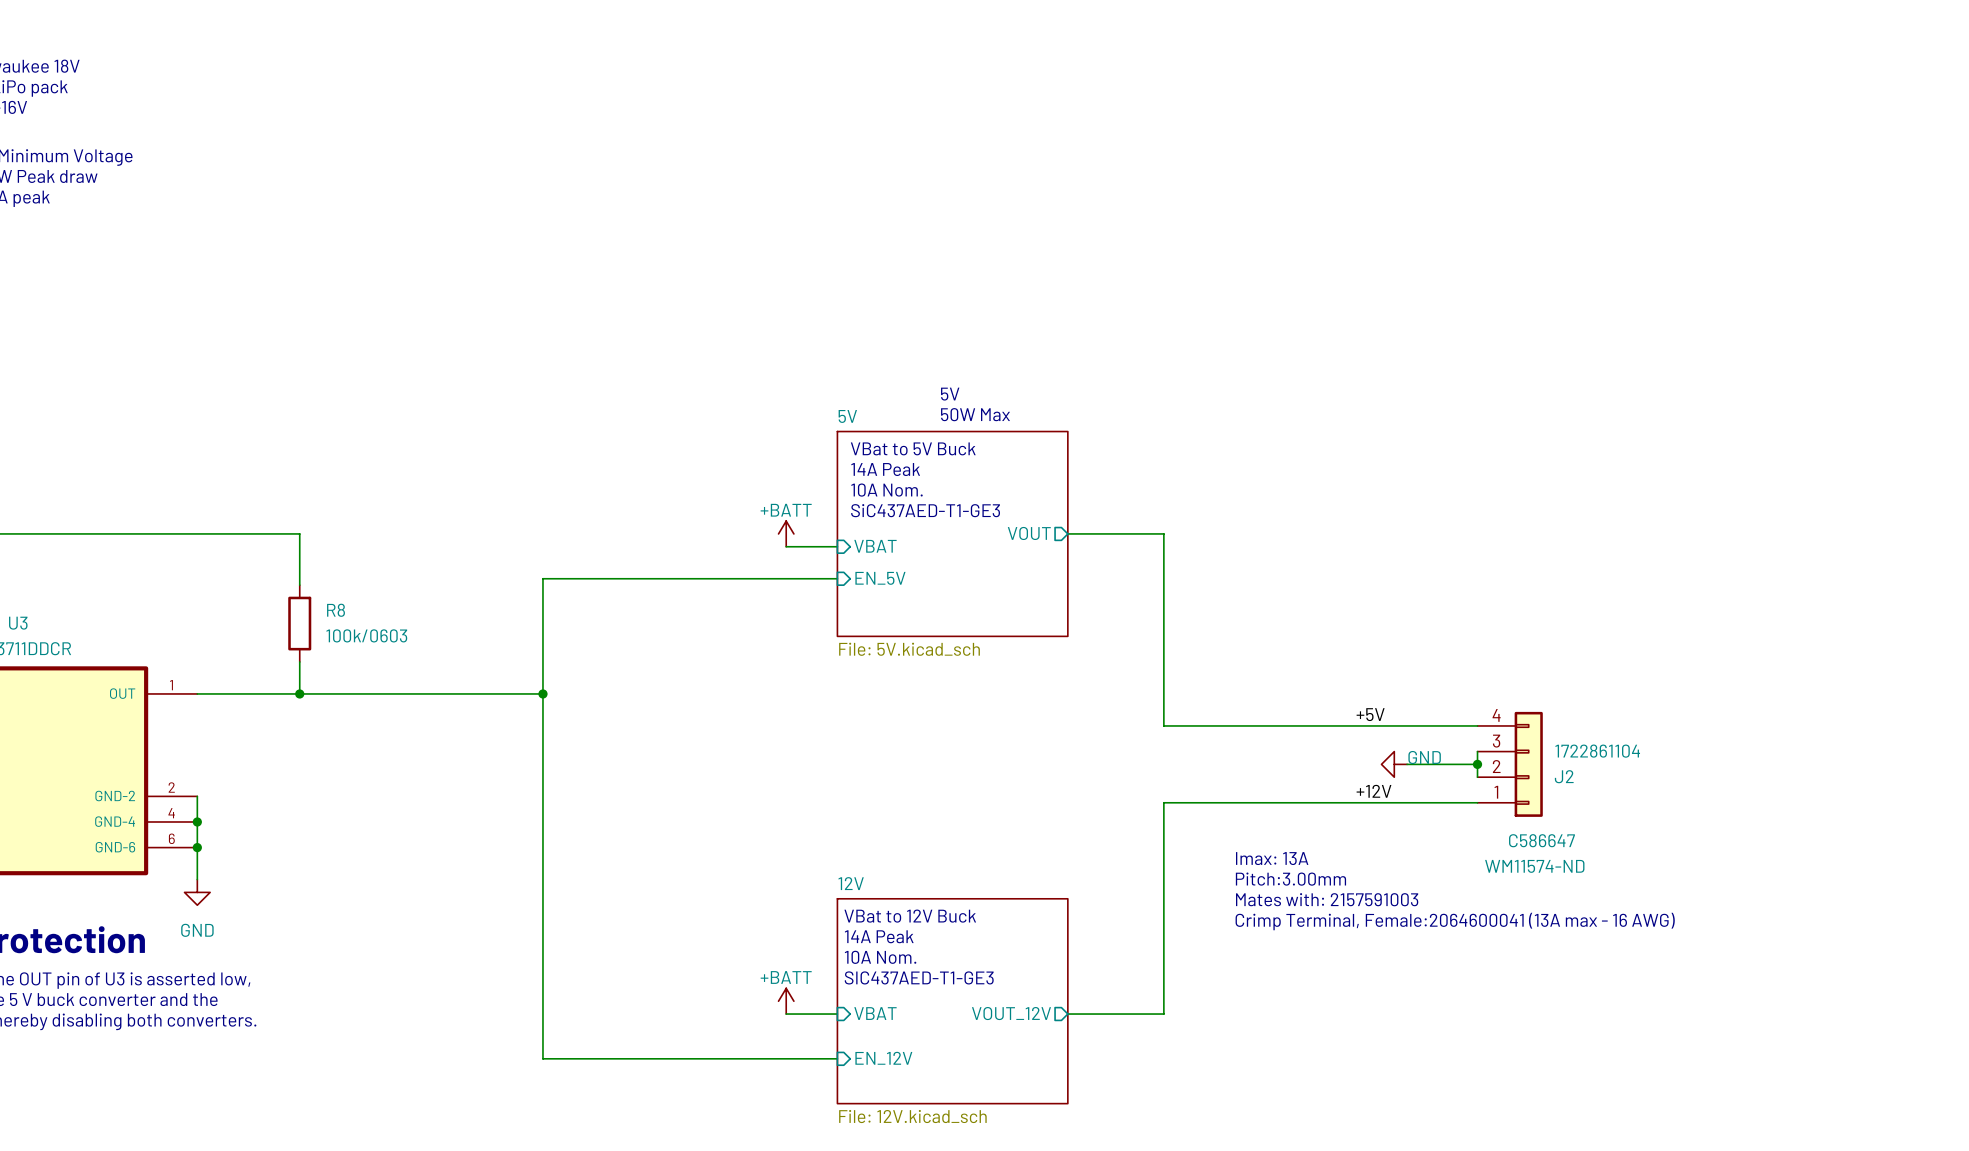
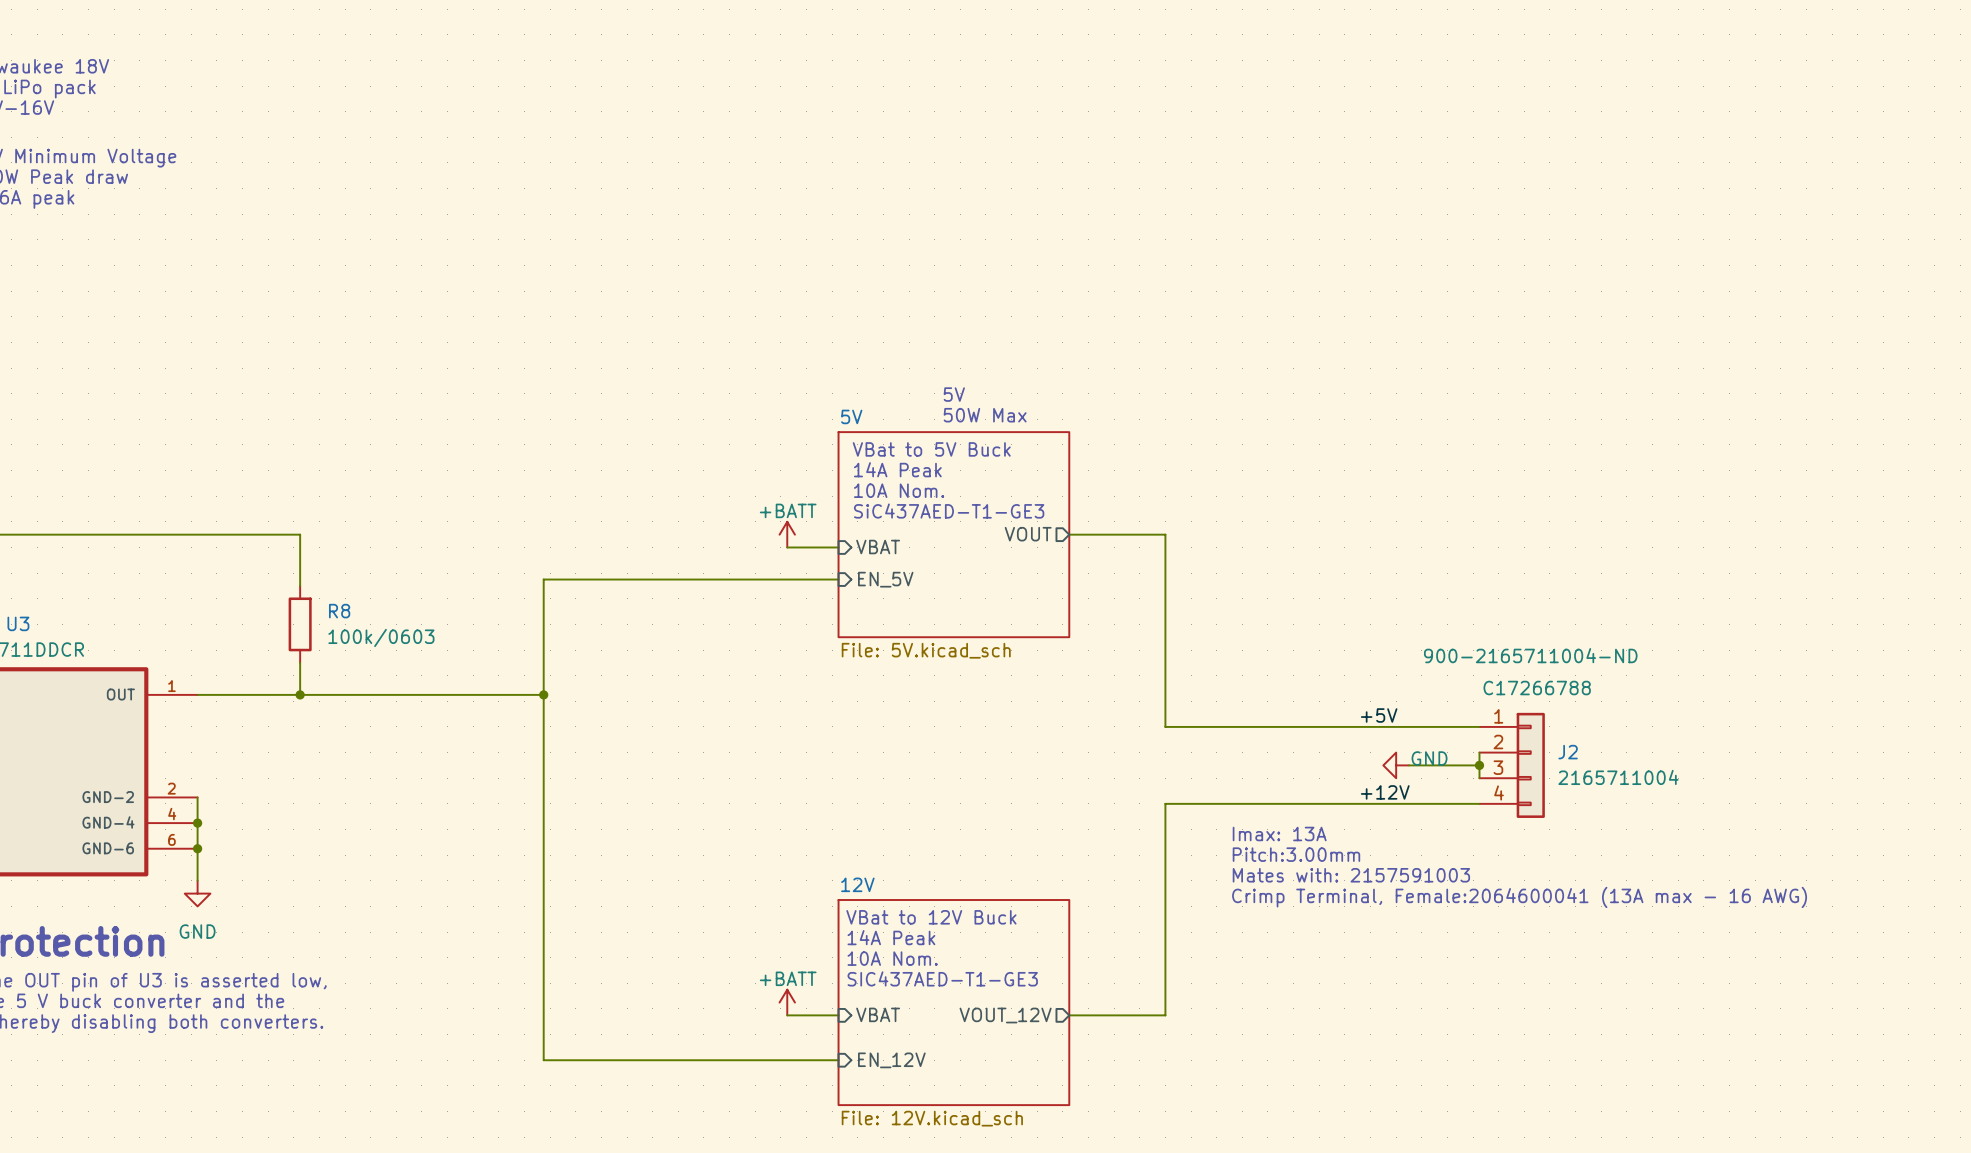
J2 value: 1722861104 (1597, 751) -> 2165711004 (1618, 777)
J2 flip: as is (1528, 764) -> up-down (1530, 765)
text: none -> Imax: 13A (1279, 833)
J2 text: C586647 (1541, 840) -> C17266788 (1537, 688)
text: Imax: 13A (1272, 858) -> Pitch:3.00mm (1296, 854)
J2 text: WM11574-ND (1534, 866) -> 900-2165711004-ND (1530, 655)
text: Pitch:3.00mm (1290, 879) -> Mates with: 2157591003 (1351, 875)
text: Mates with: 2157591003 (1327, 899) -> Crimp Terminal, Female:2064600041 (13A max - 16 AWG) (1519, 897)
text: Crimp Terminal, Female:2064600041 (13A max - 16 AWG) (1455, 921) -> none

